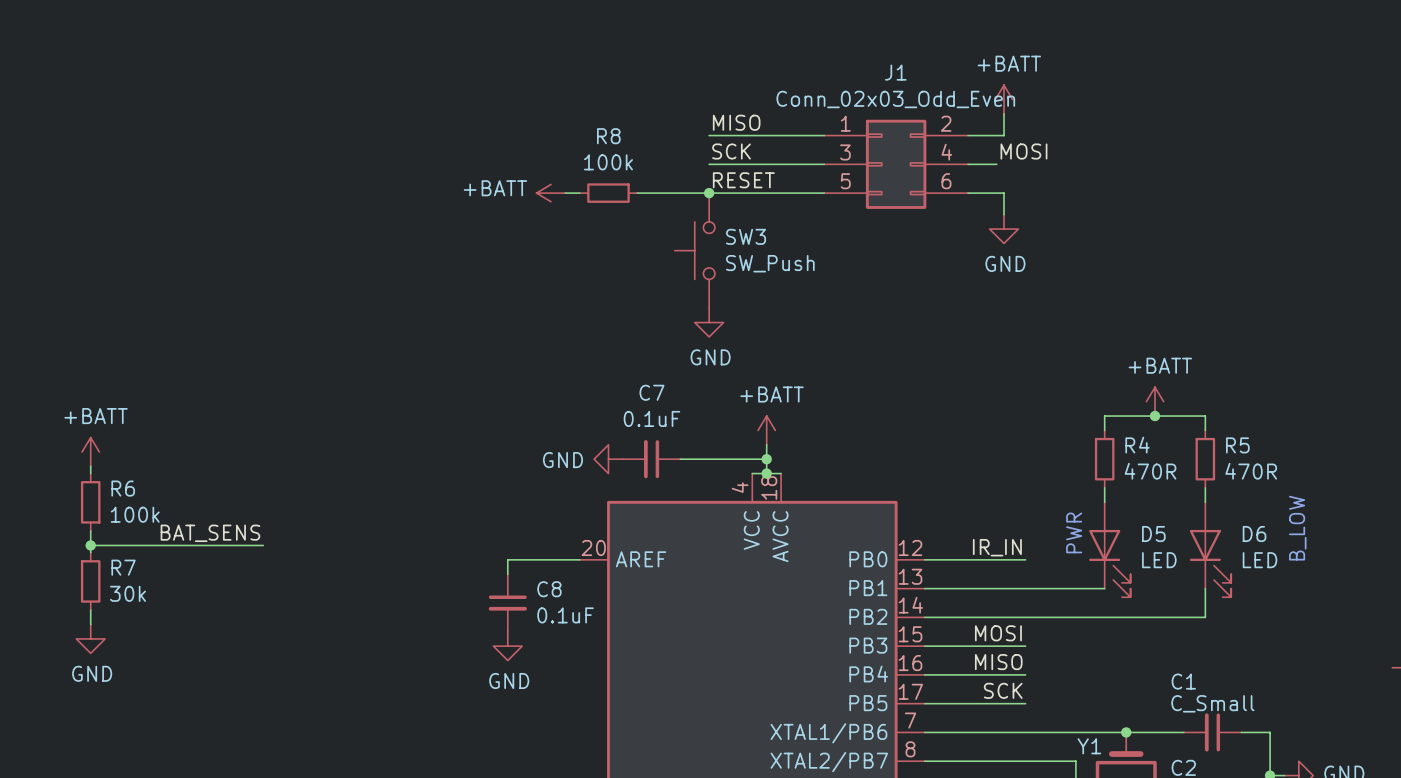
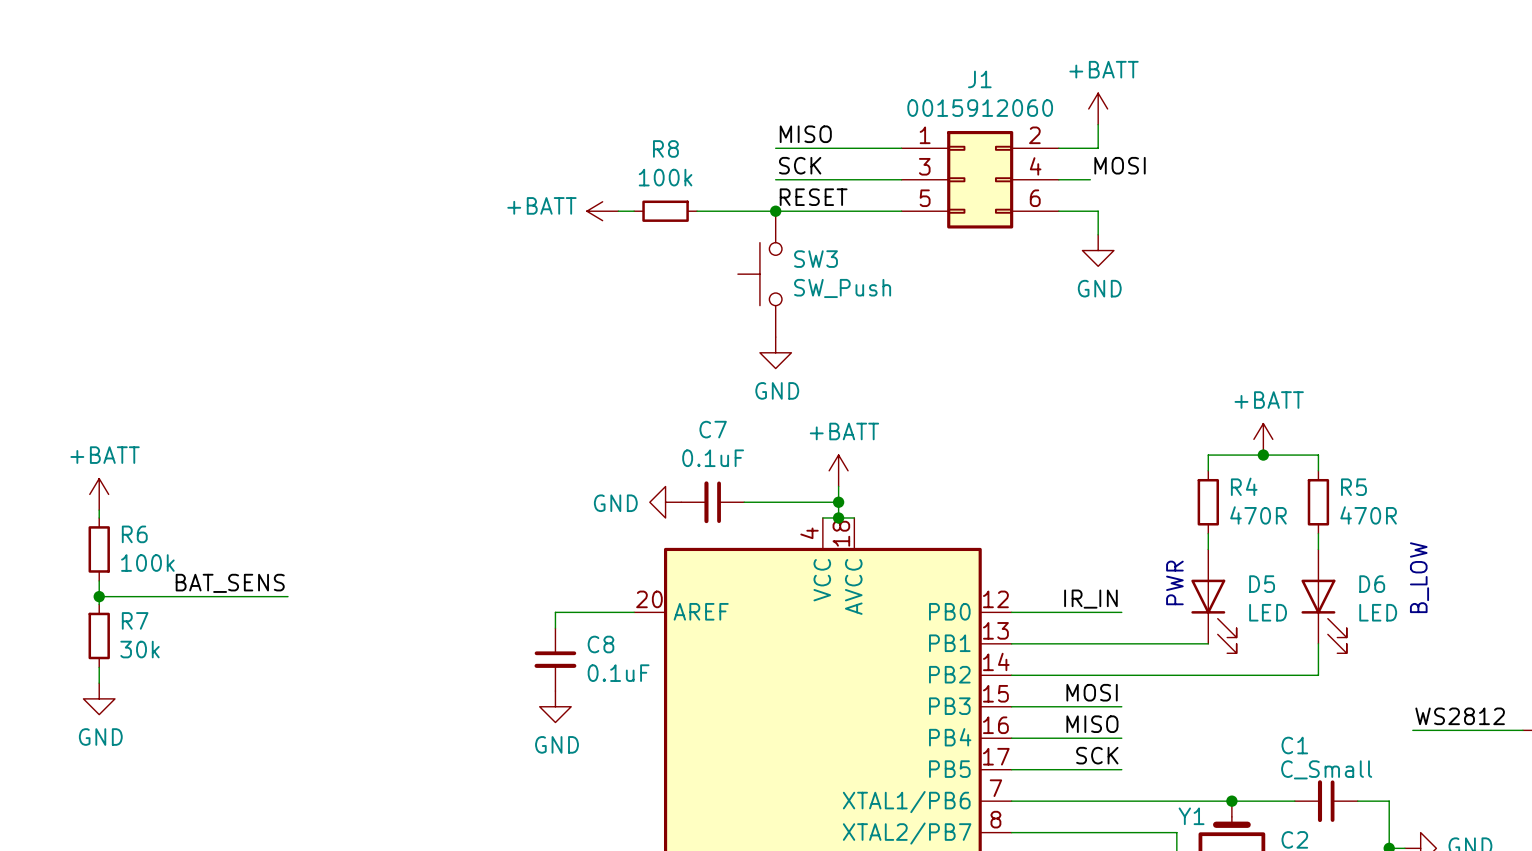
J1 value: Conn_02x03_Odd_Even (895, 99) -> 0015912060 (980, 108)
label: none -> WS2812 (1460, 716)
wire: none -> (1412, 730) (1522, 730)

